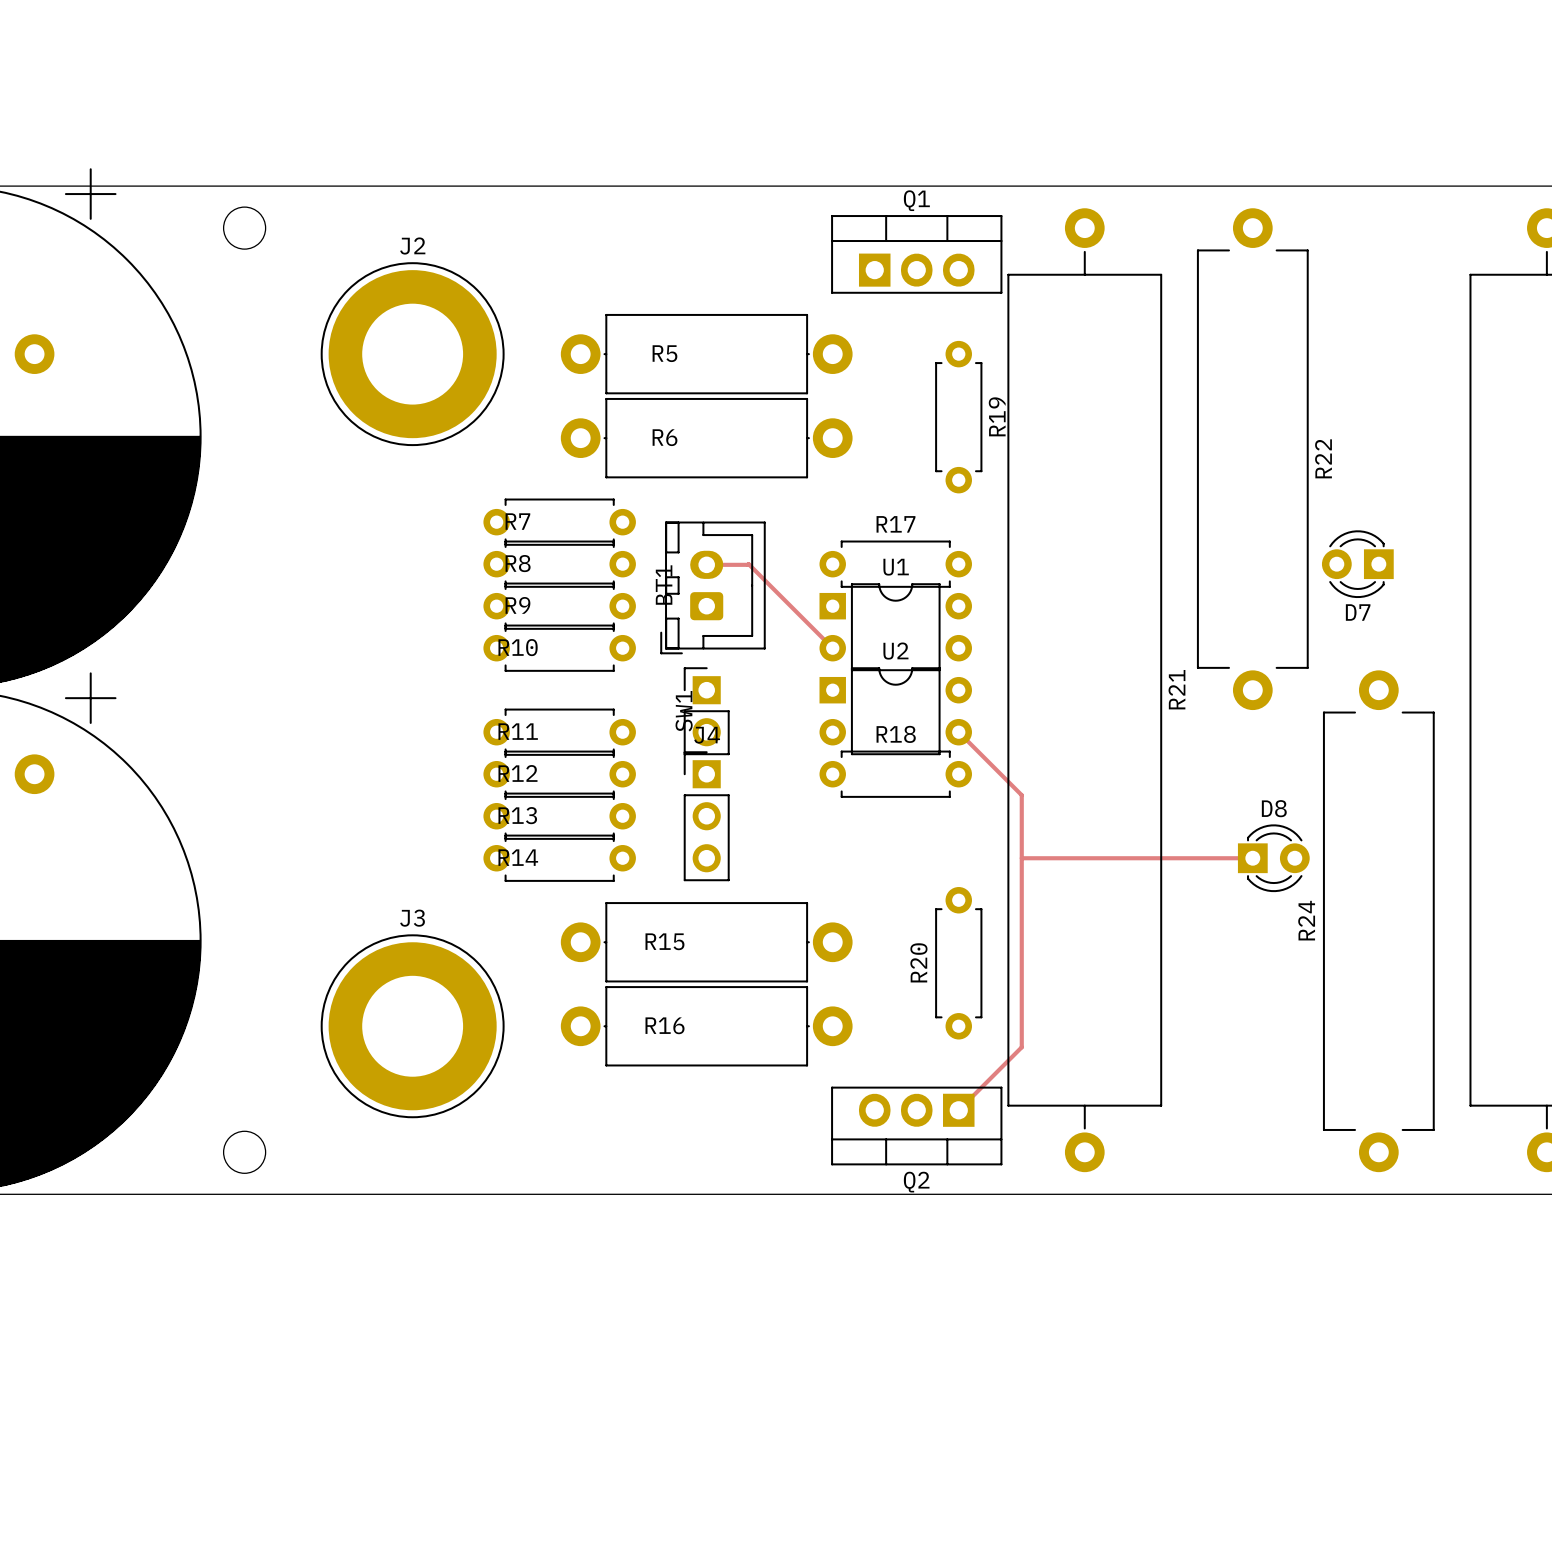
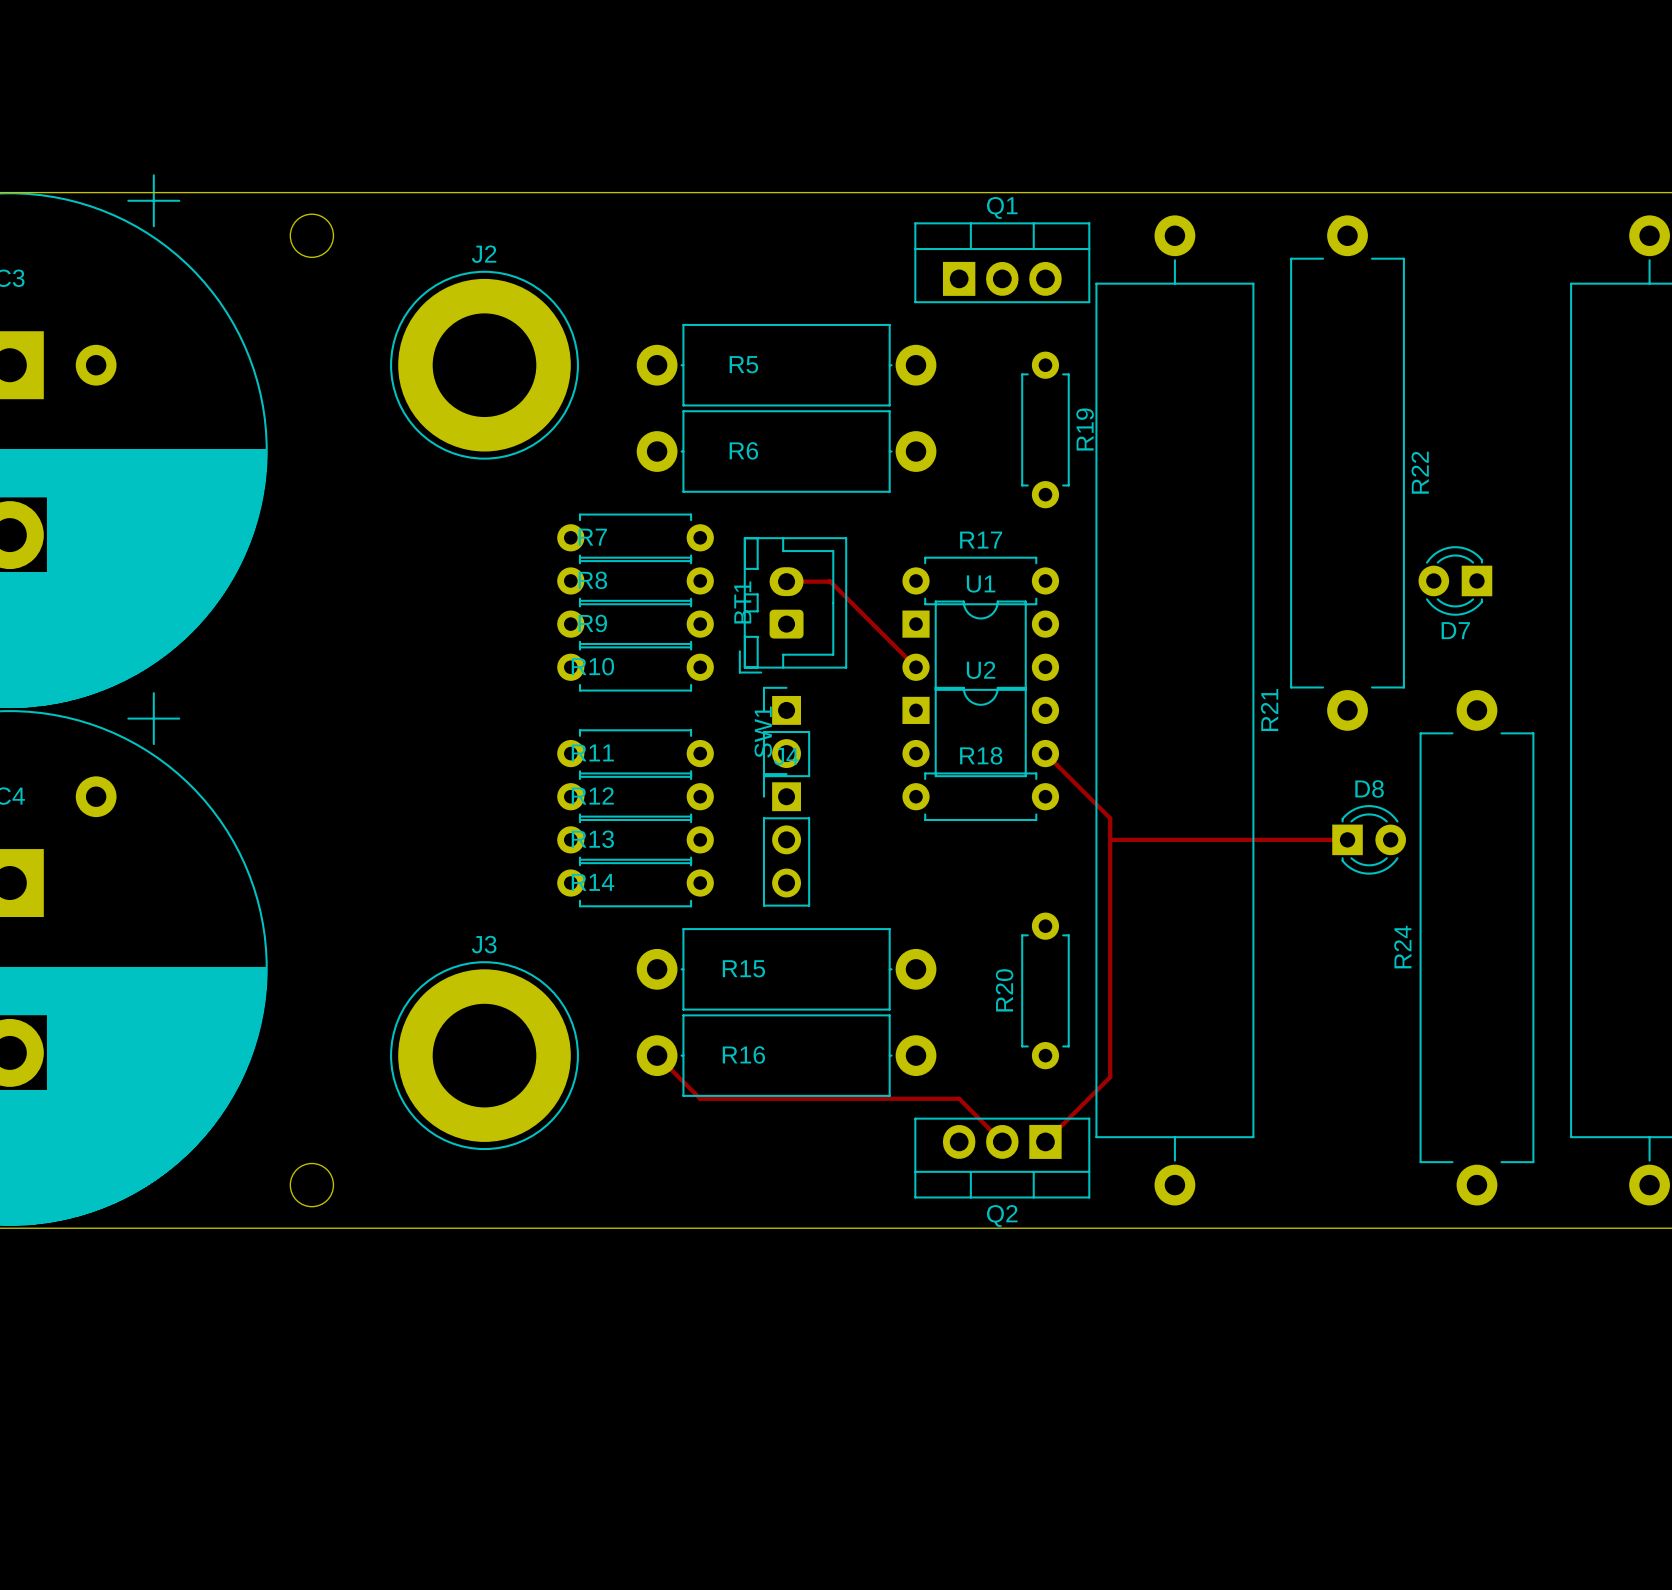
track: (1021, 858) (1252, 858) -> (1110, 839) (1347, 839)
D8 position: (1273, 858) -> (1369, 839)
track: none -> (657, 1055) (700, 1098) (959, 1098) (1002, 1141)

